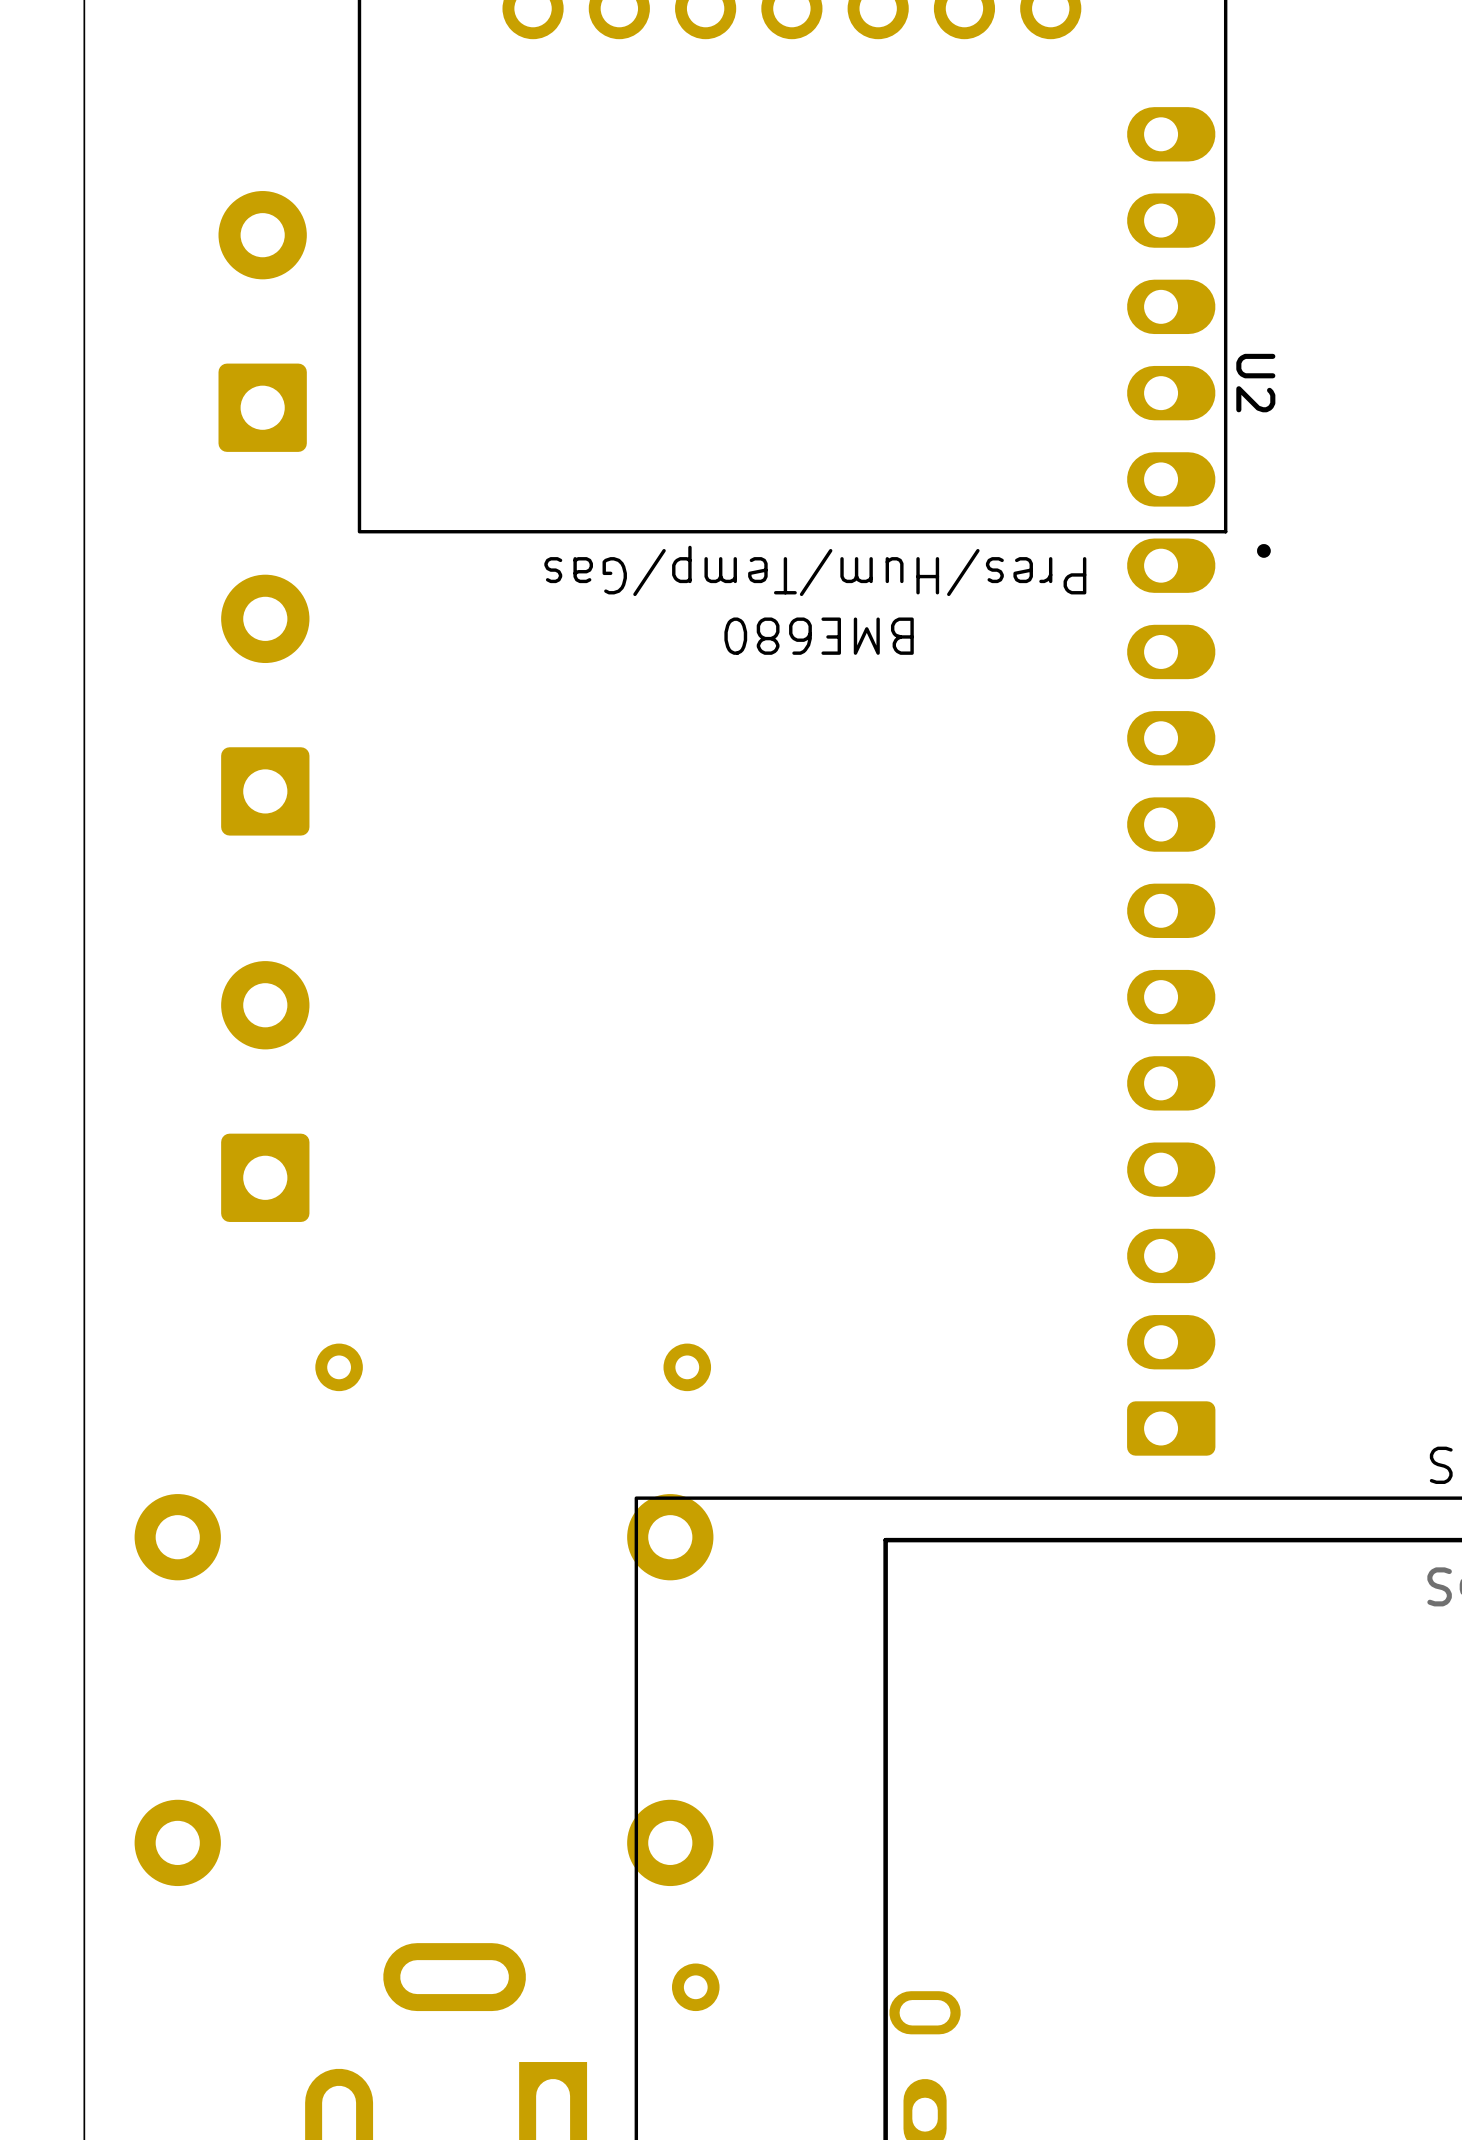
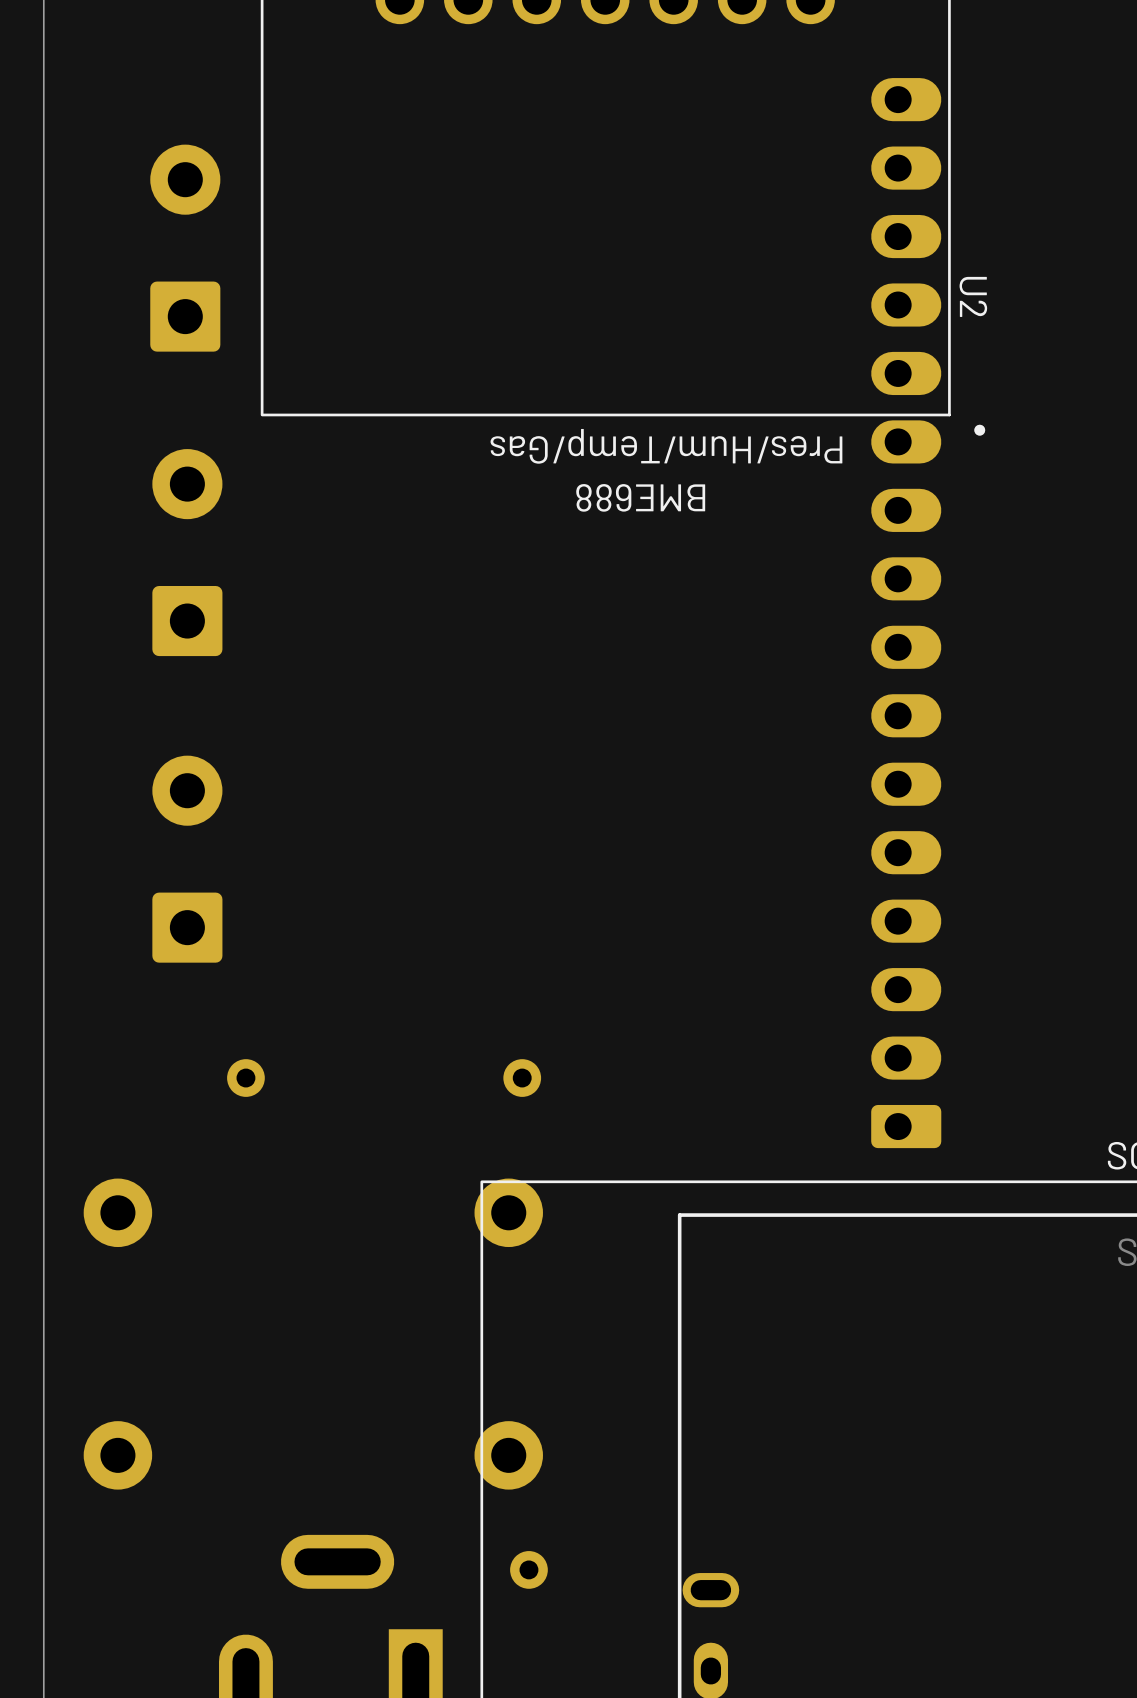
U2 text: BME680 (819, 636) -> BME688 (640, 497)

